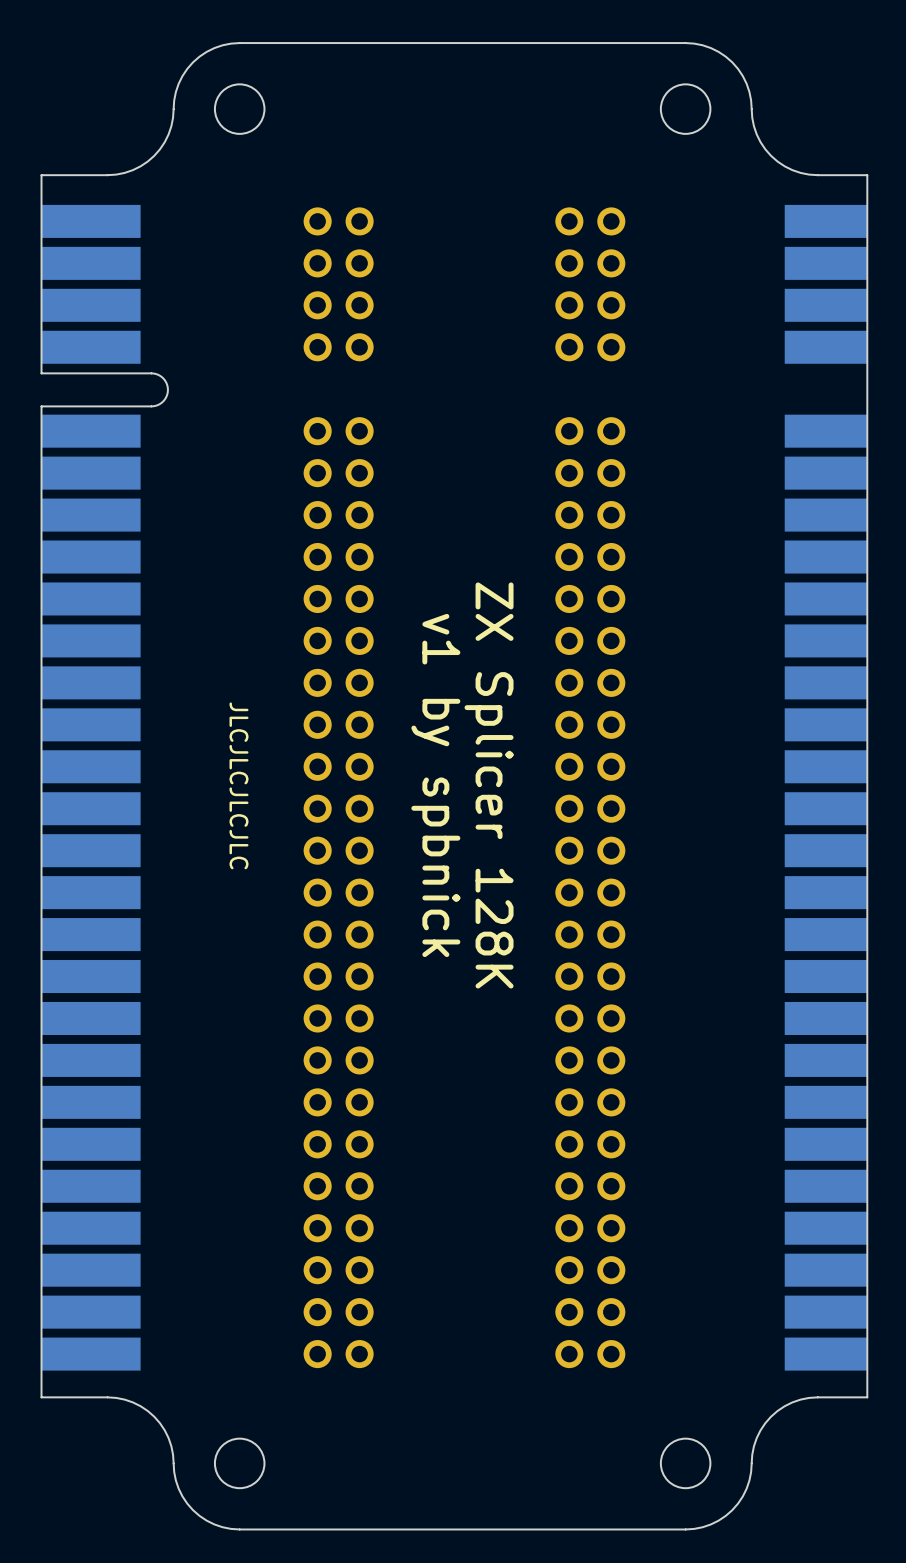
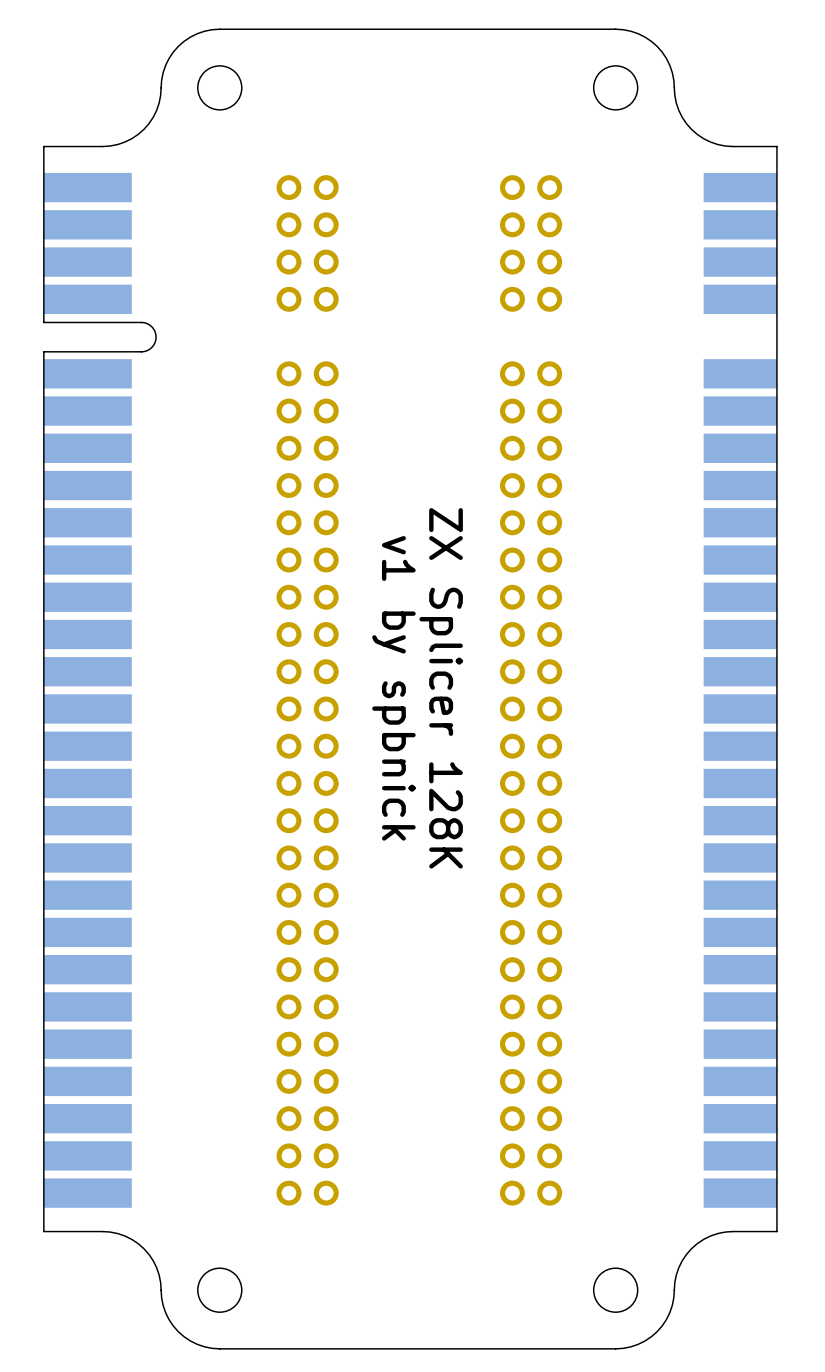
text: JLCJLCJLCJLC (239, 785) -> none

